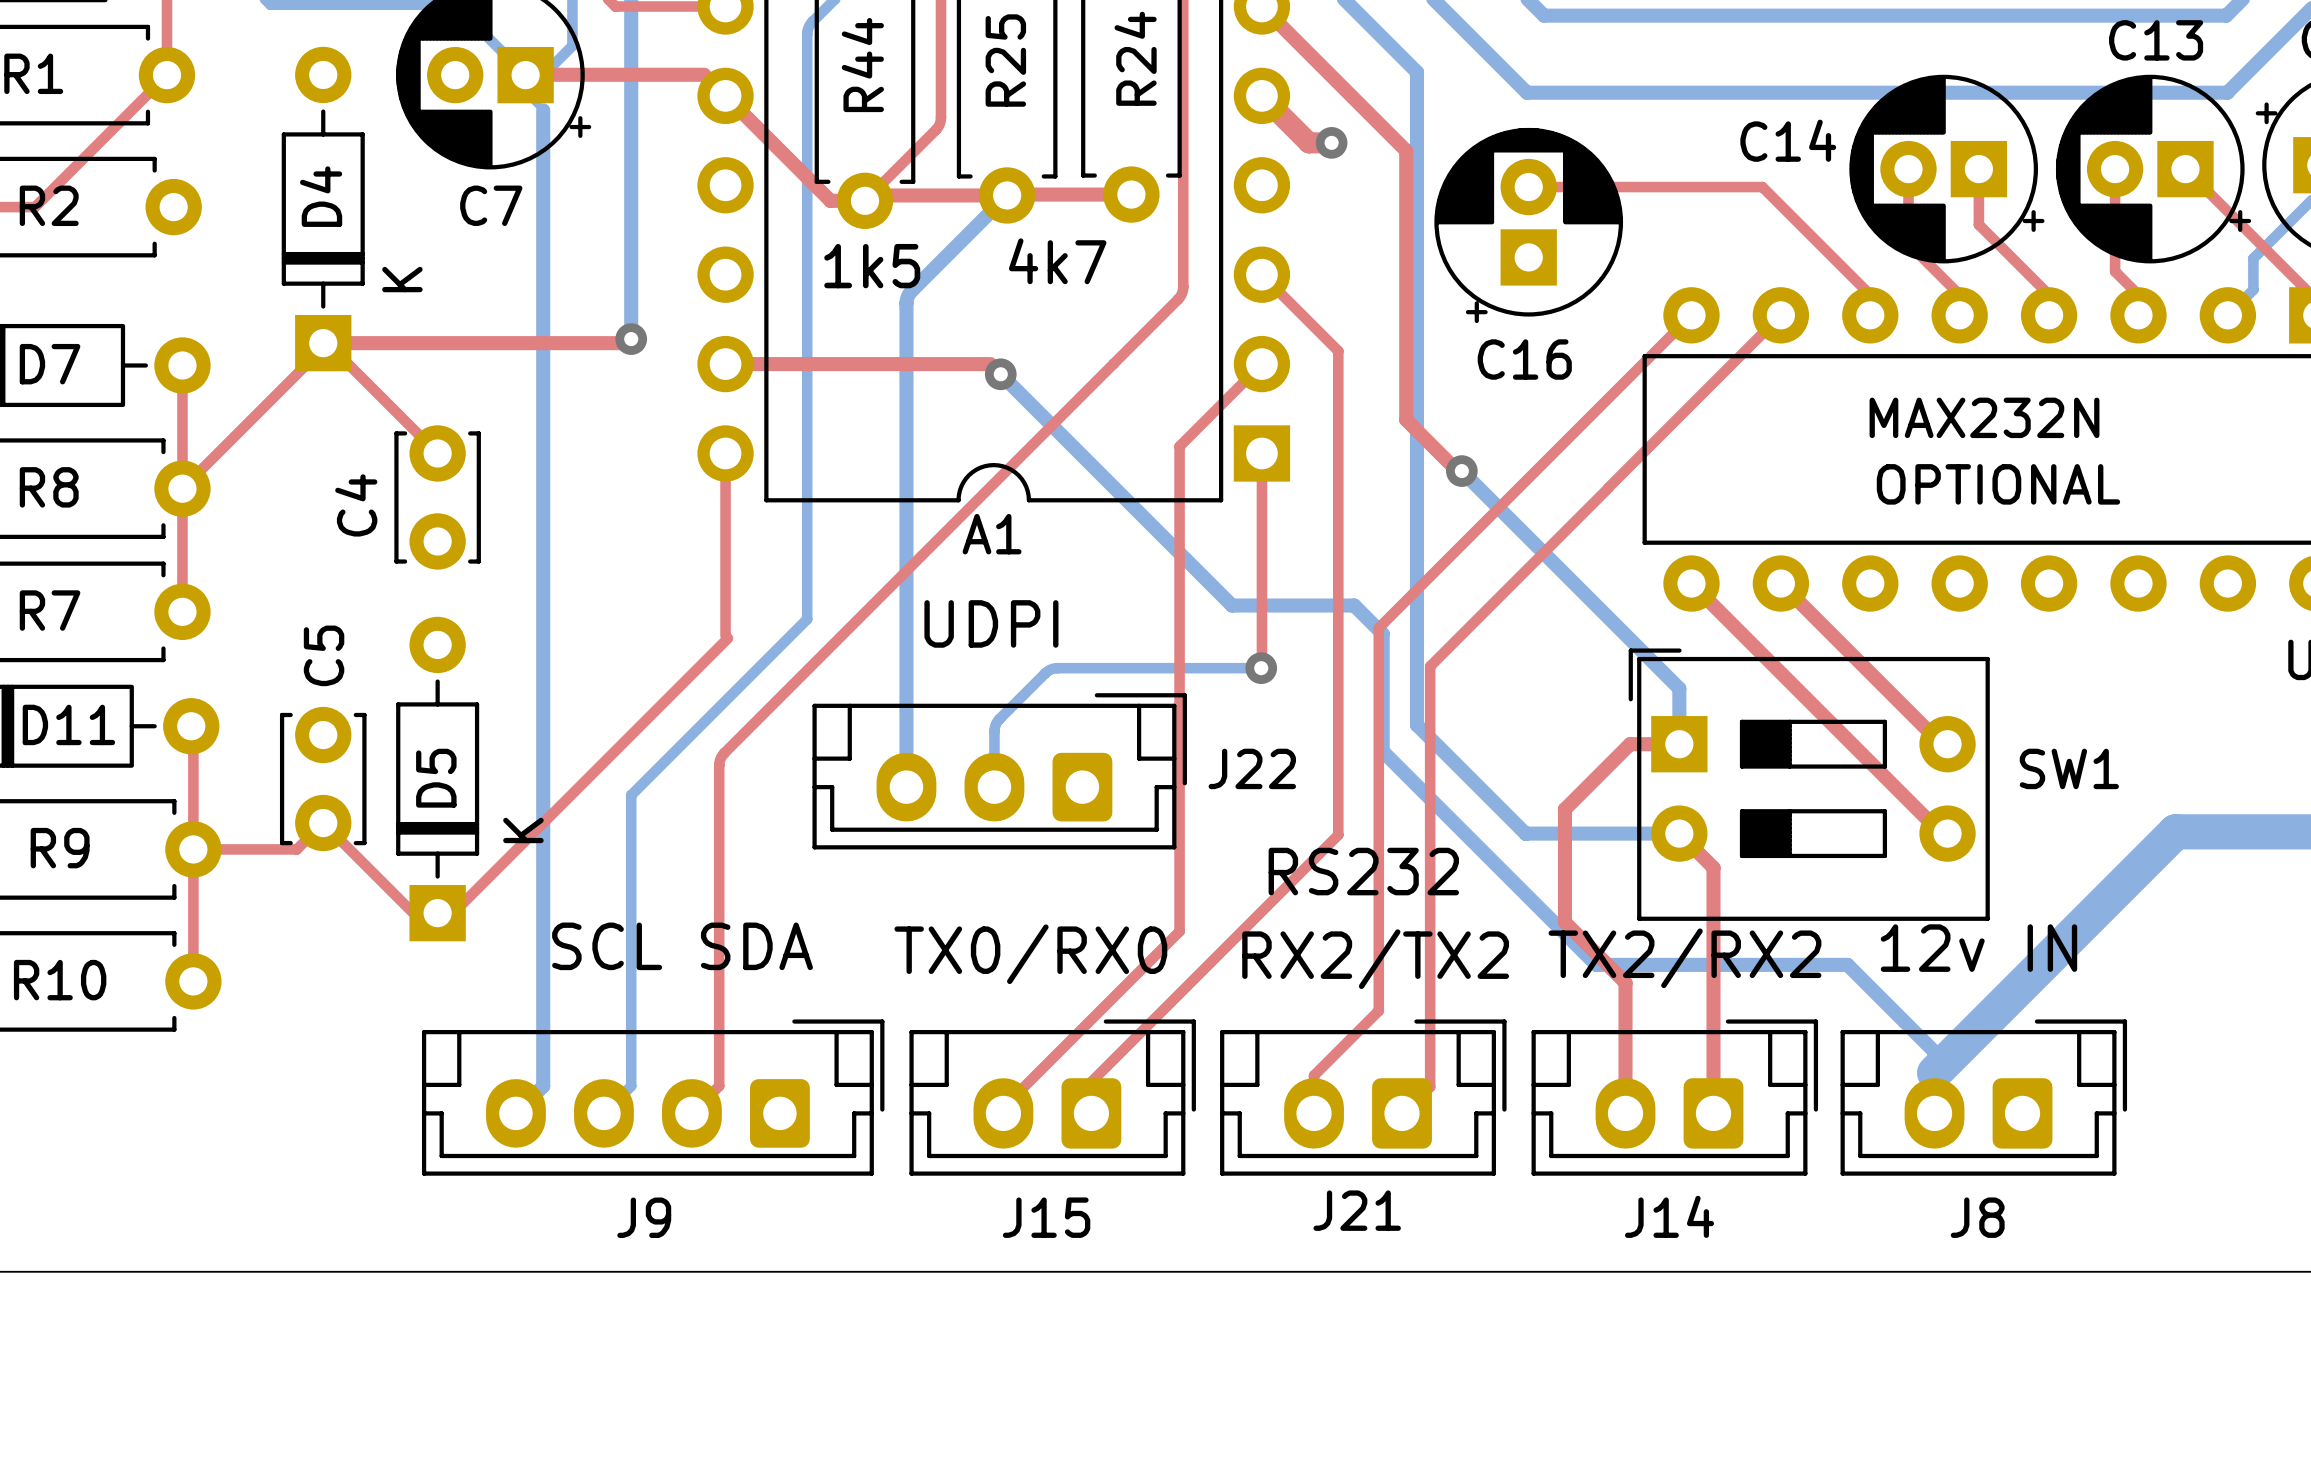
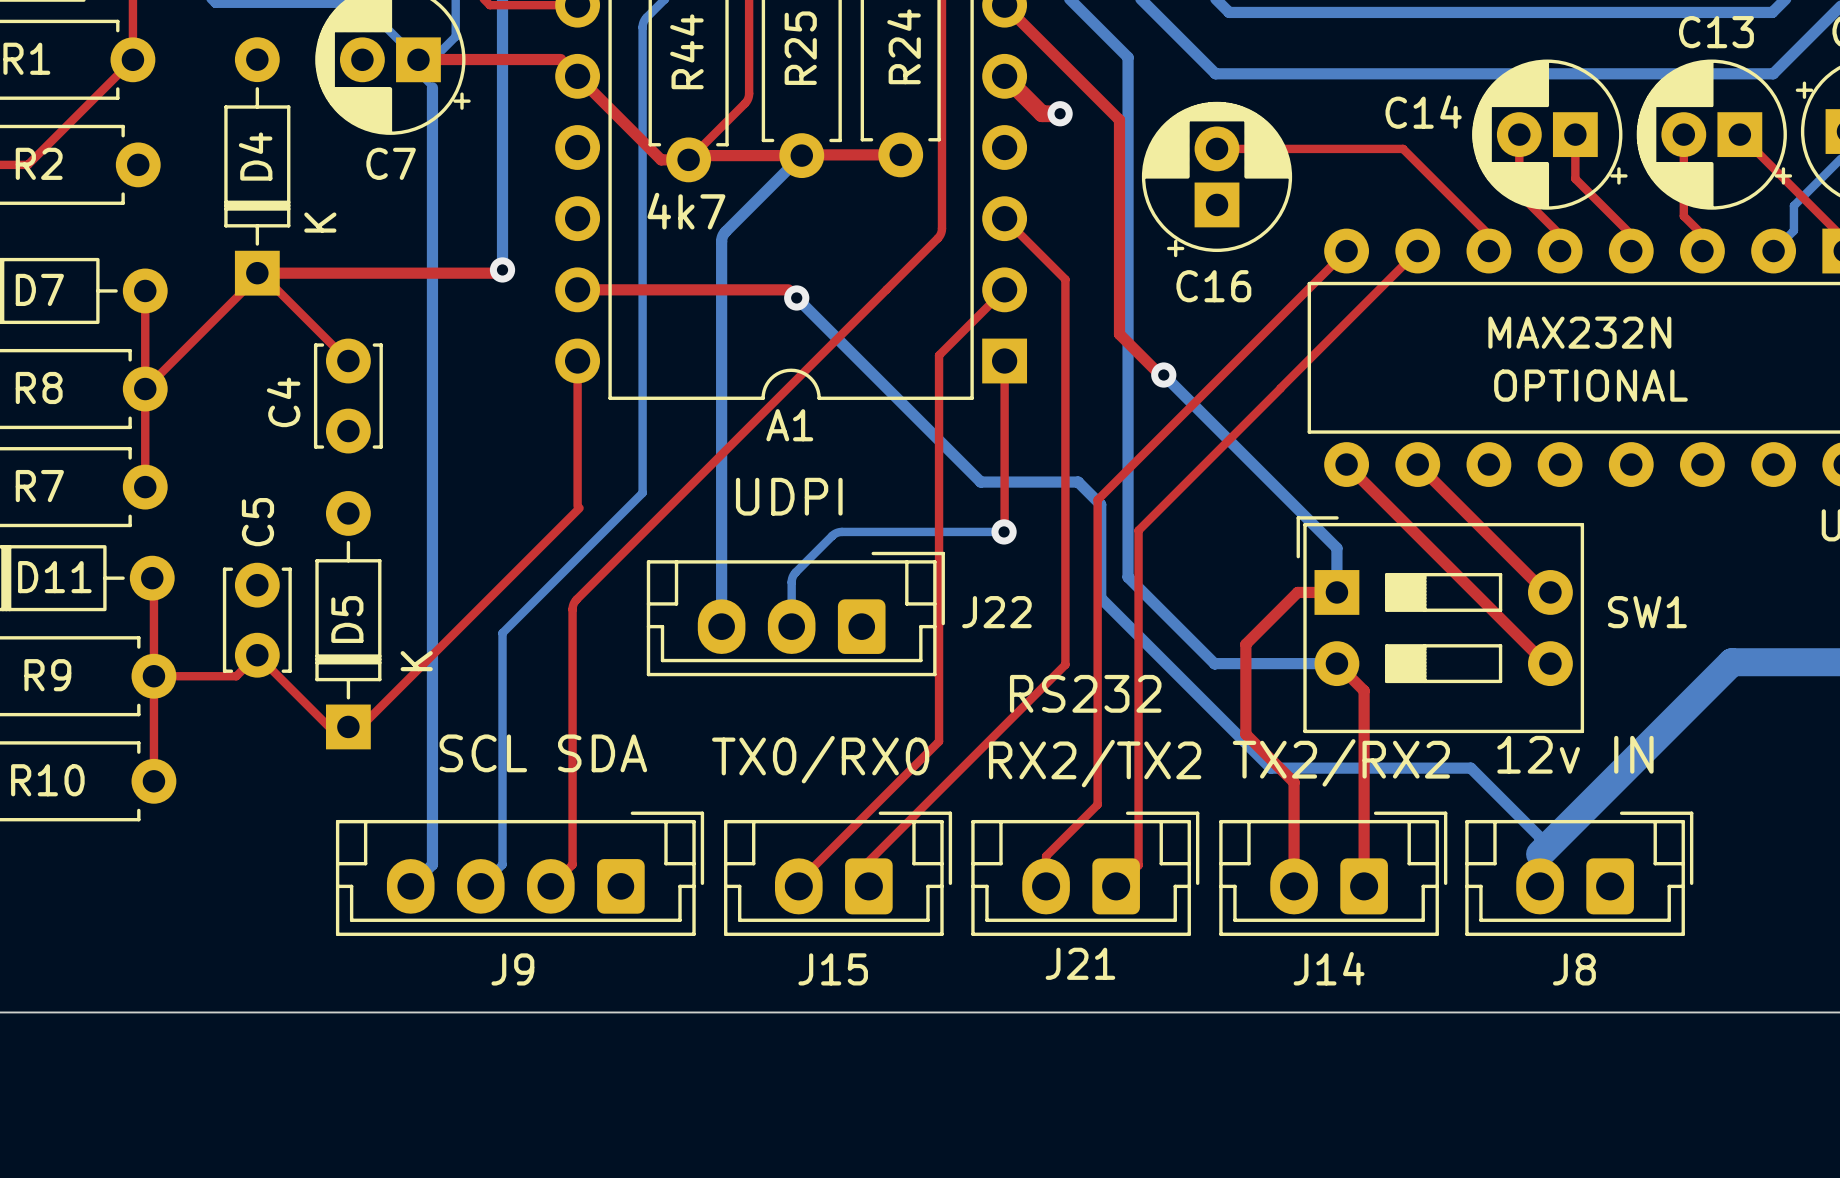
text: 4k7 (1057, 261) -> none
text: 1k5 (872, 266) -> 4k7 (686, 211)

